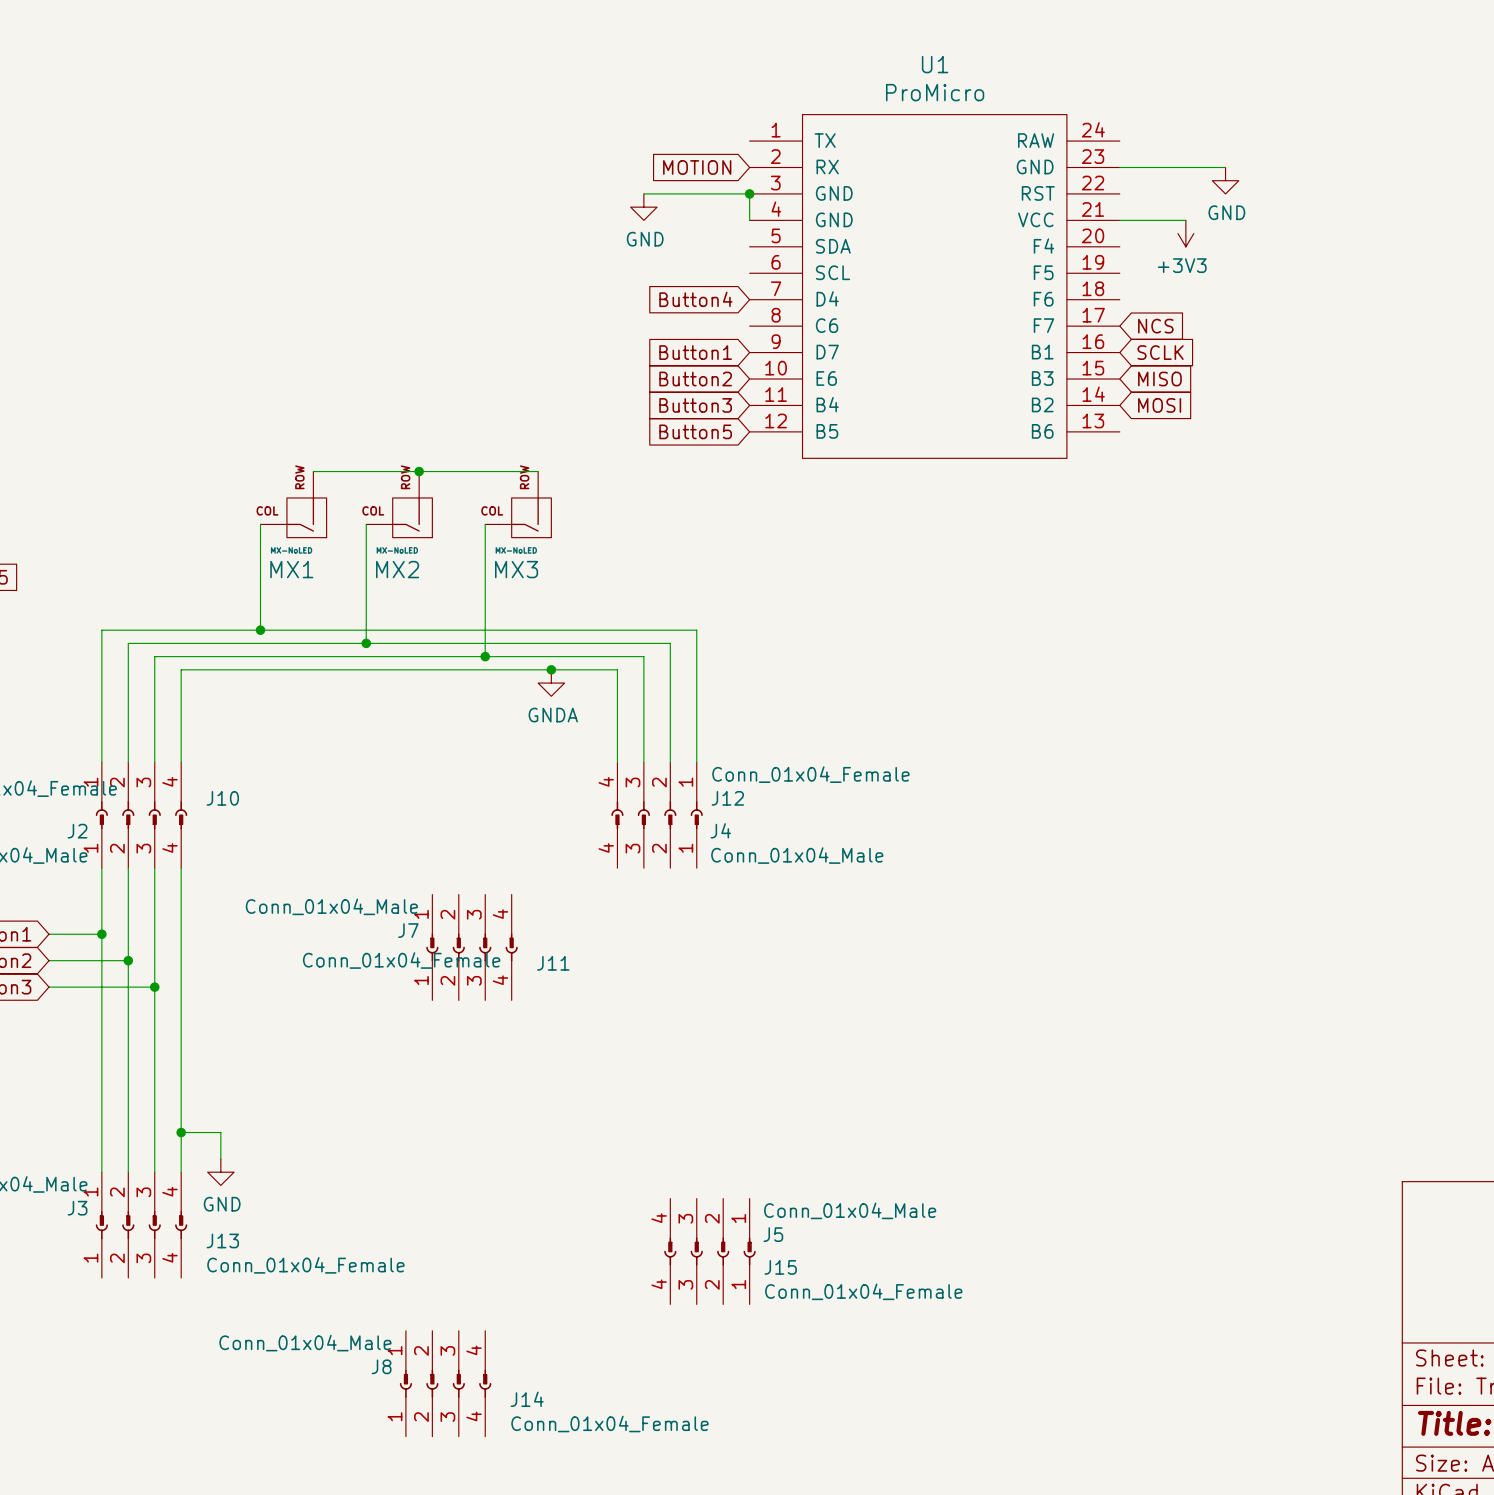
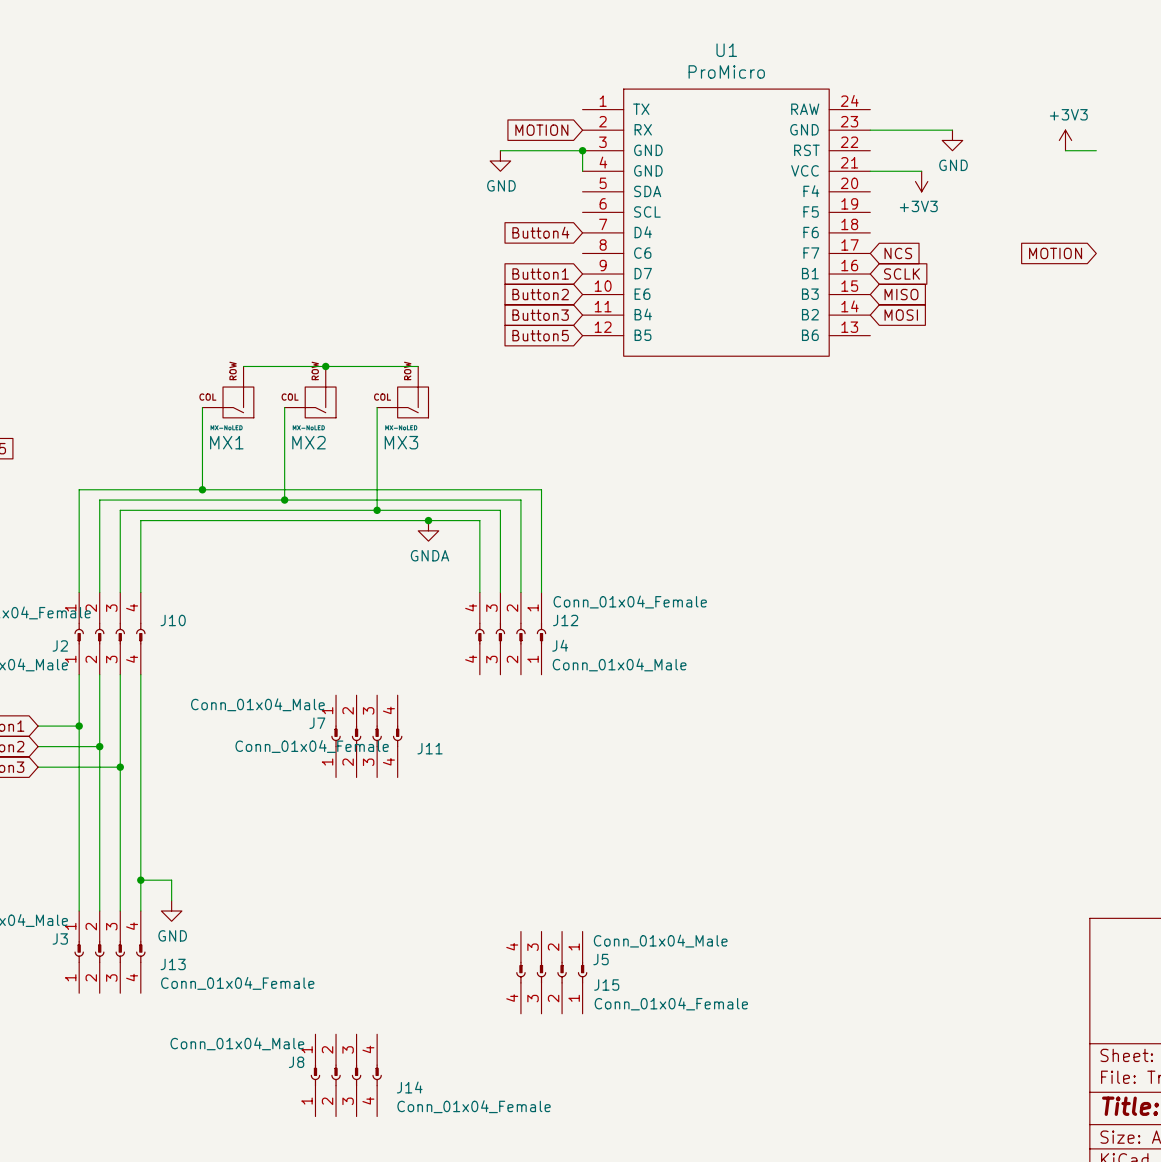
power symbol: none -> +3V3 (1065, 140)
wire: none -> (1065, 150) (1096, 150)
global label: none -> MOTION (1055, 253)

